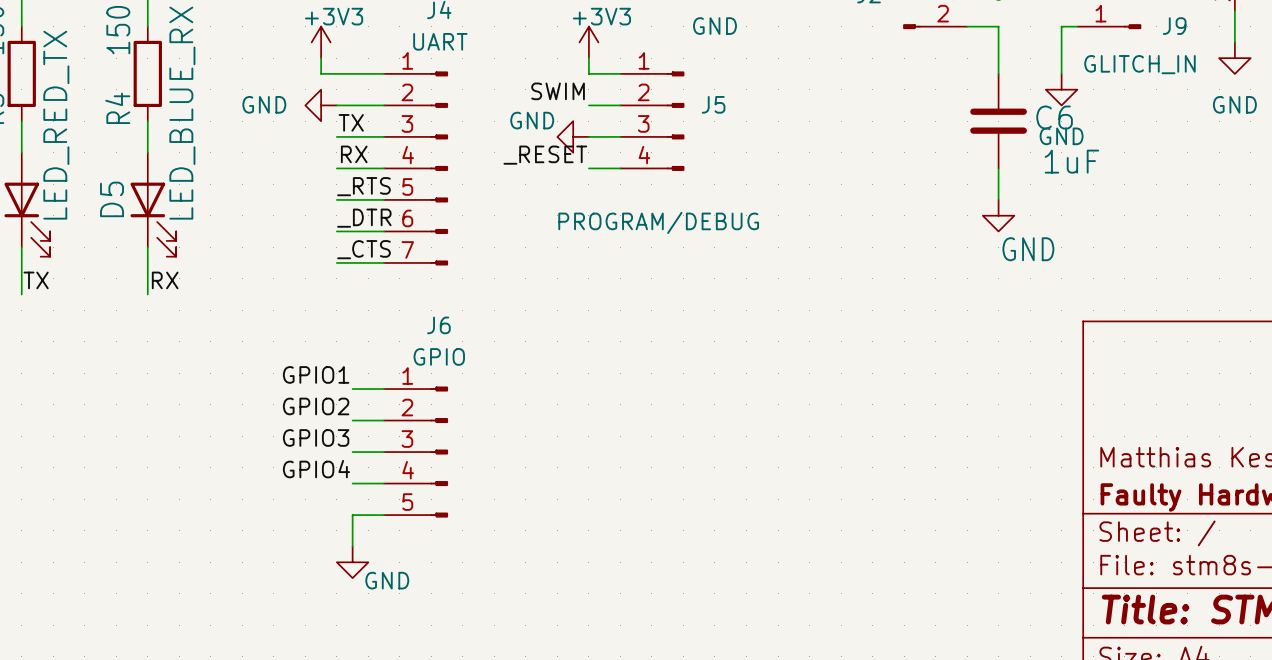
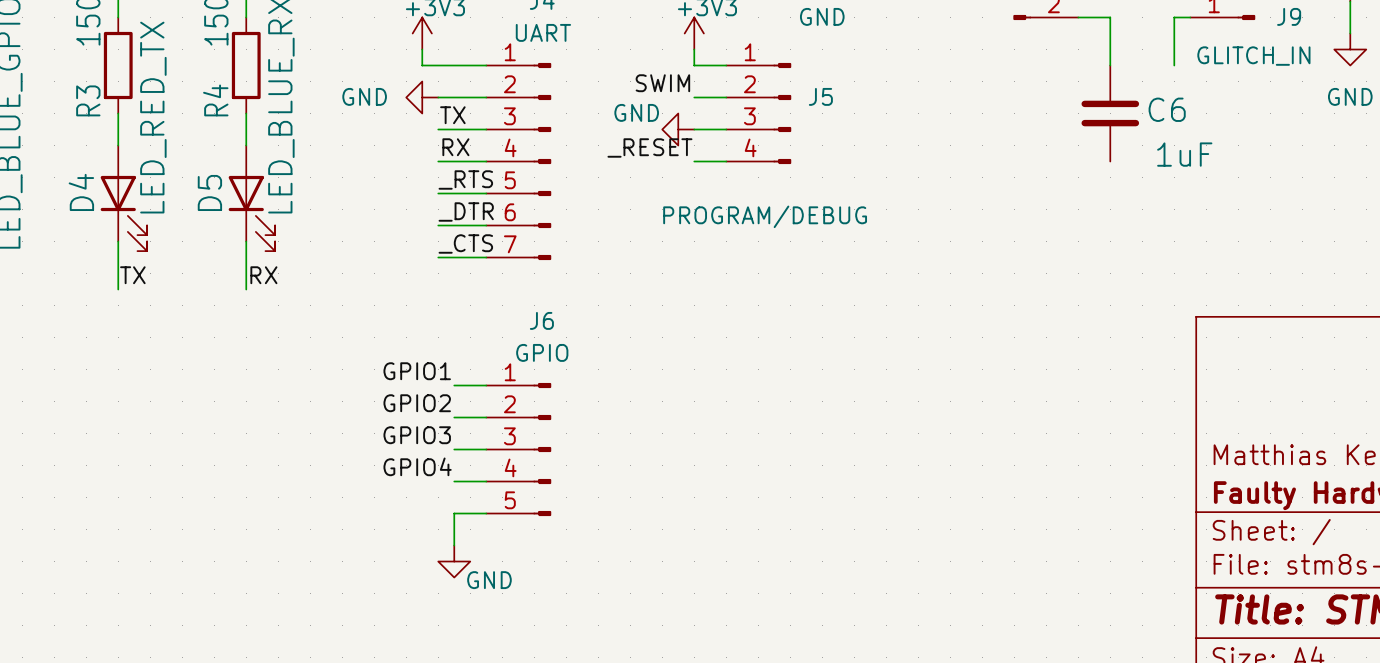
power symbol: GND (1061, 89) -> none
wire: (998, 168) (998, 199) -> none
power symbol: GND (998, 215) -> none

